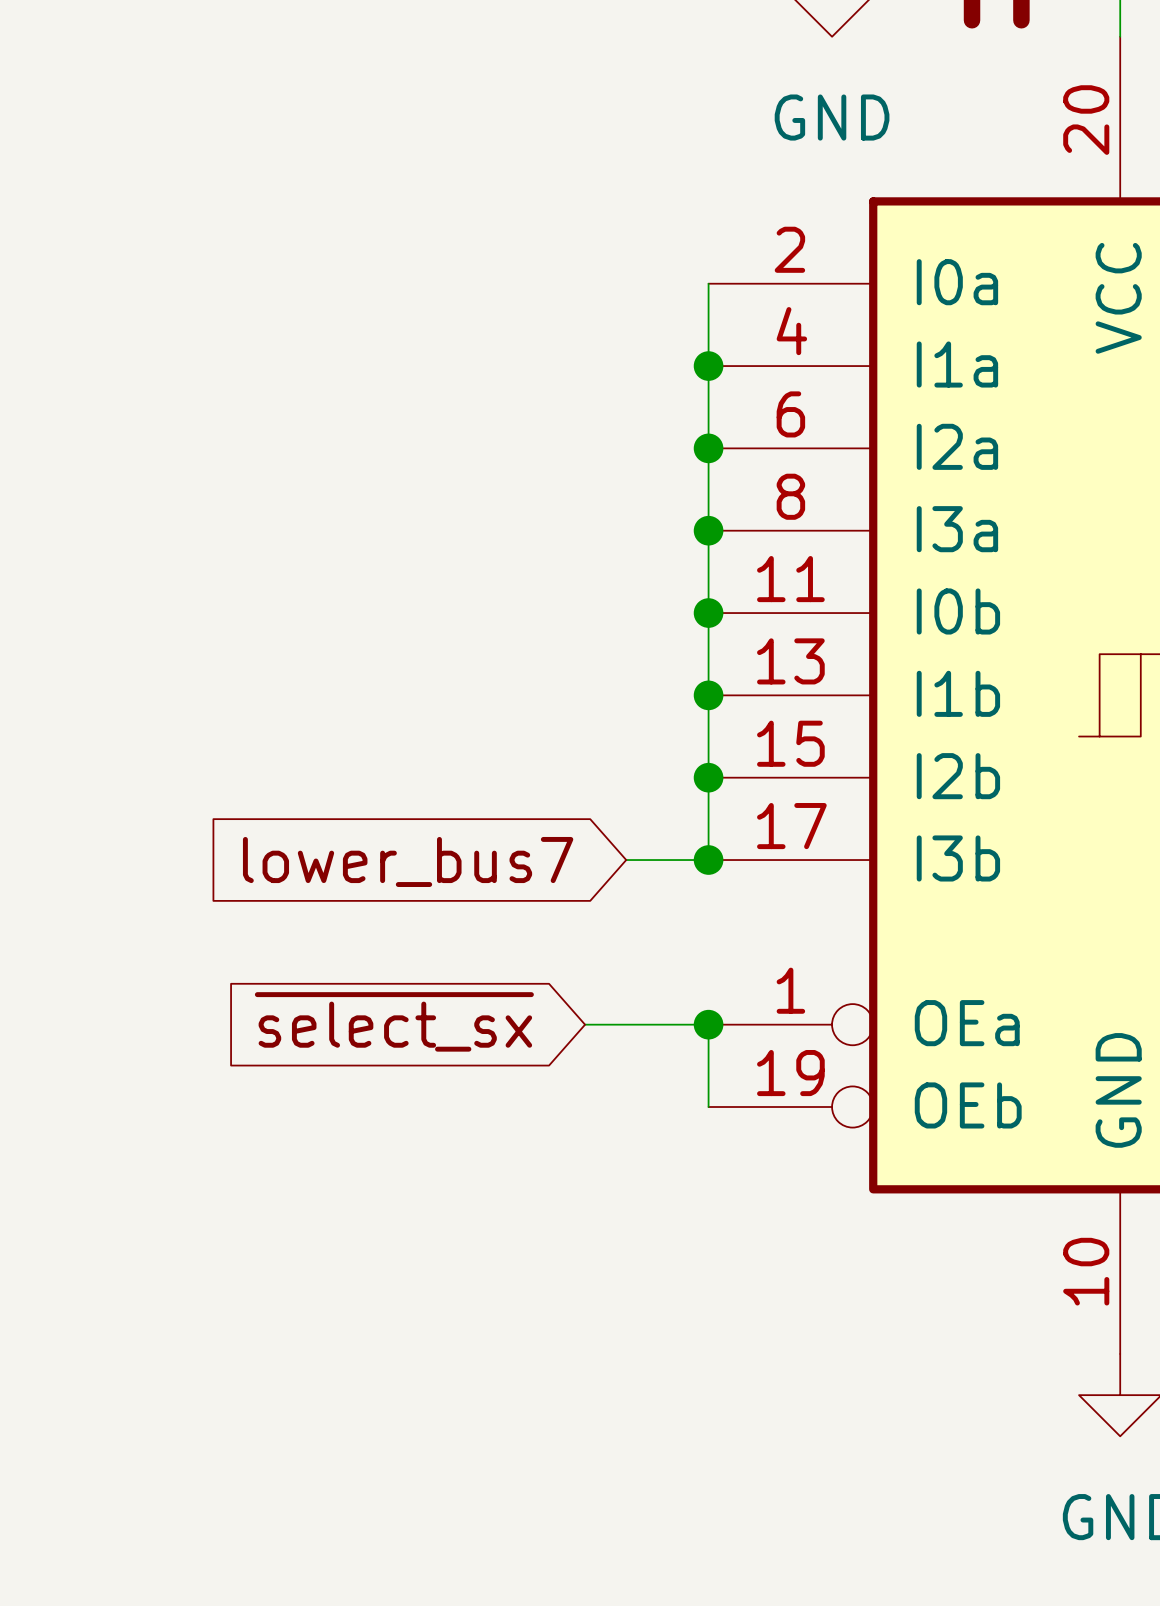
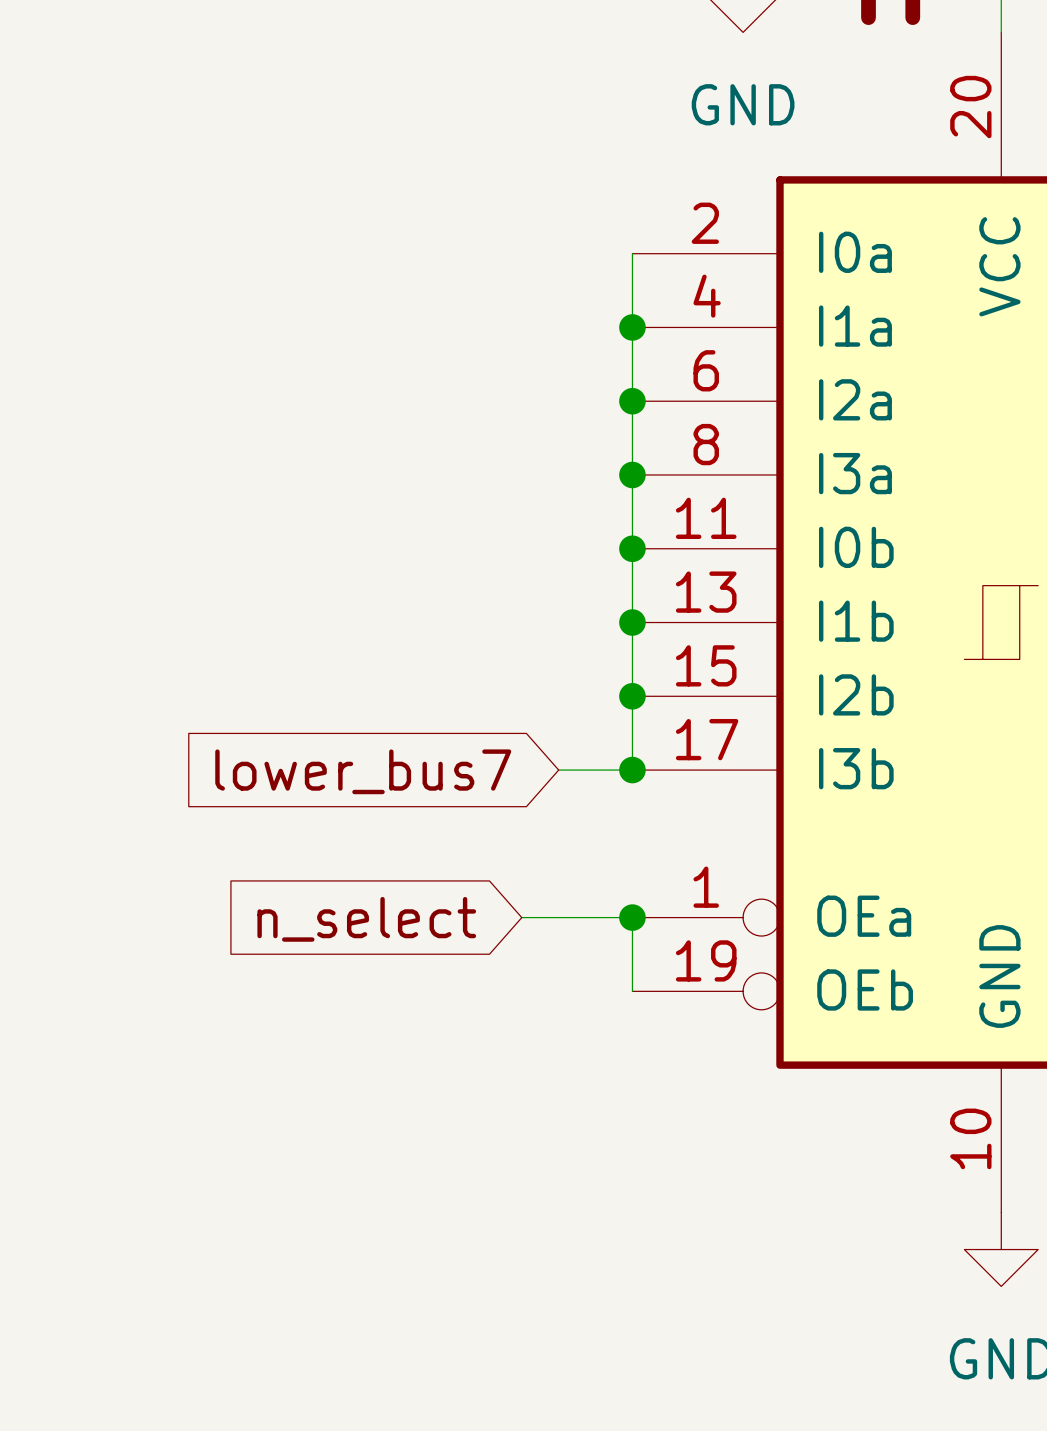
global label: ~{select_sx} (394, 1021) -> n_select (366, 919)

